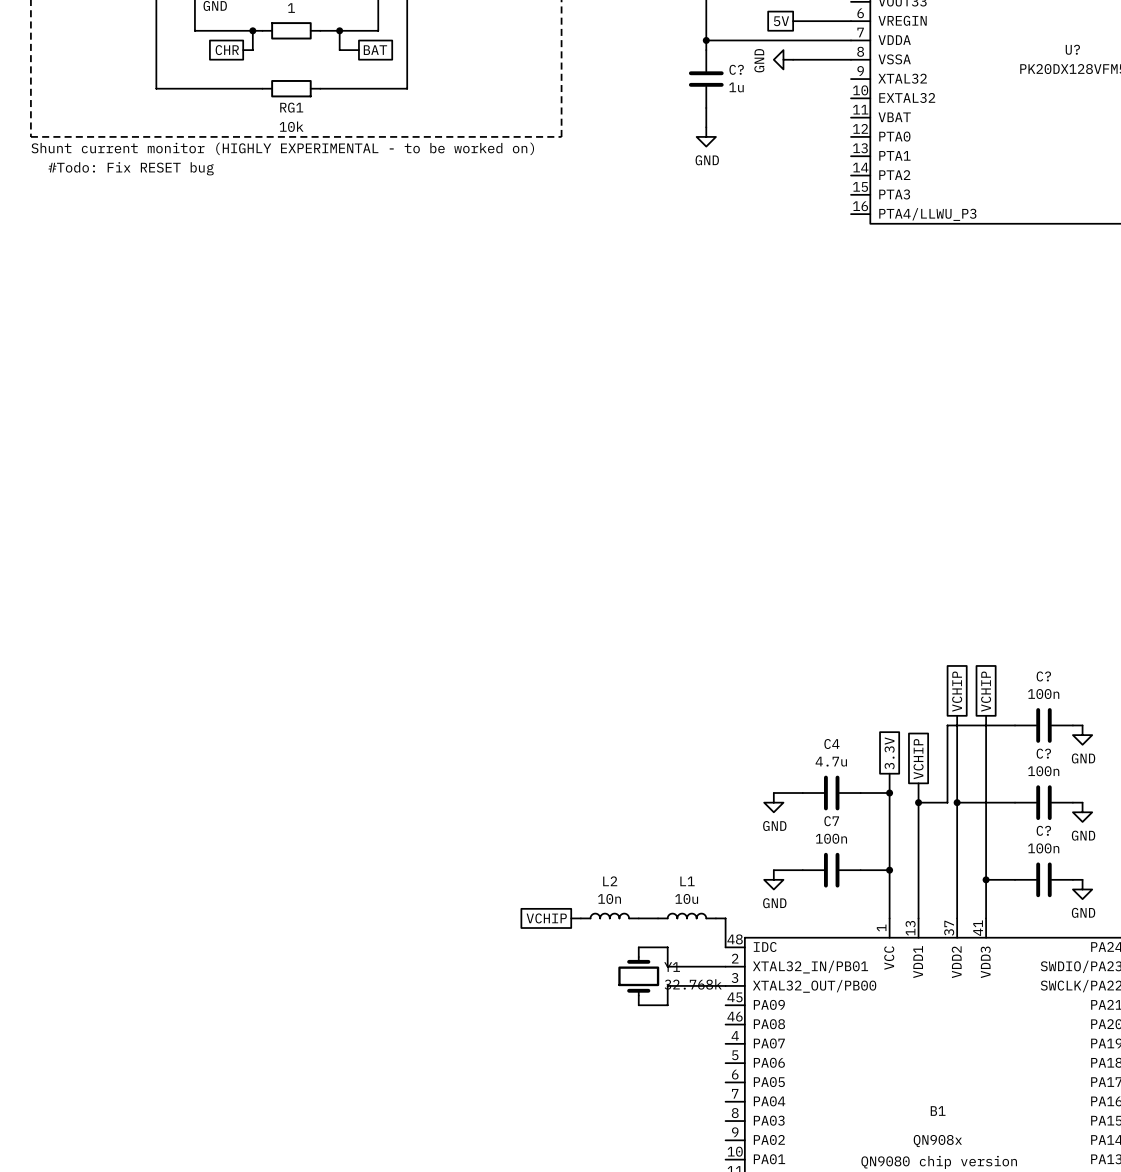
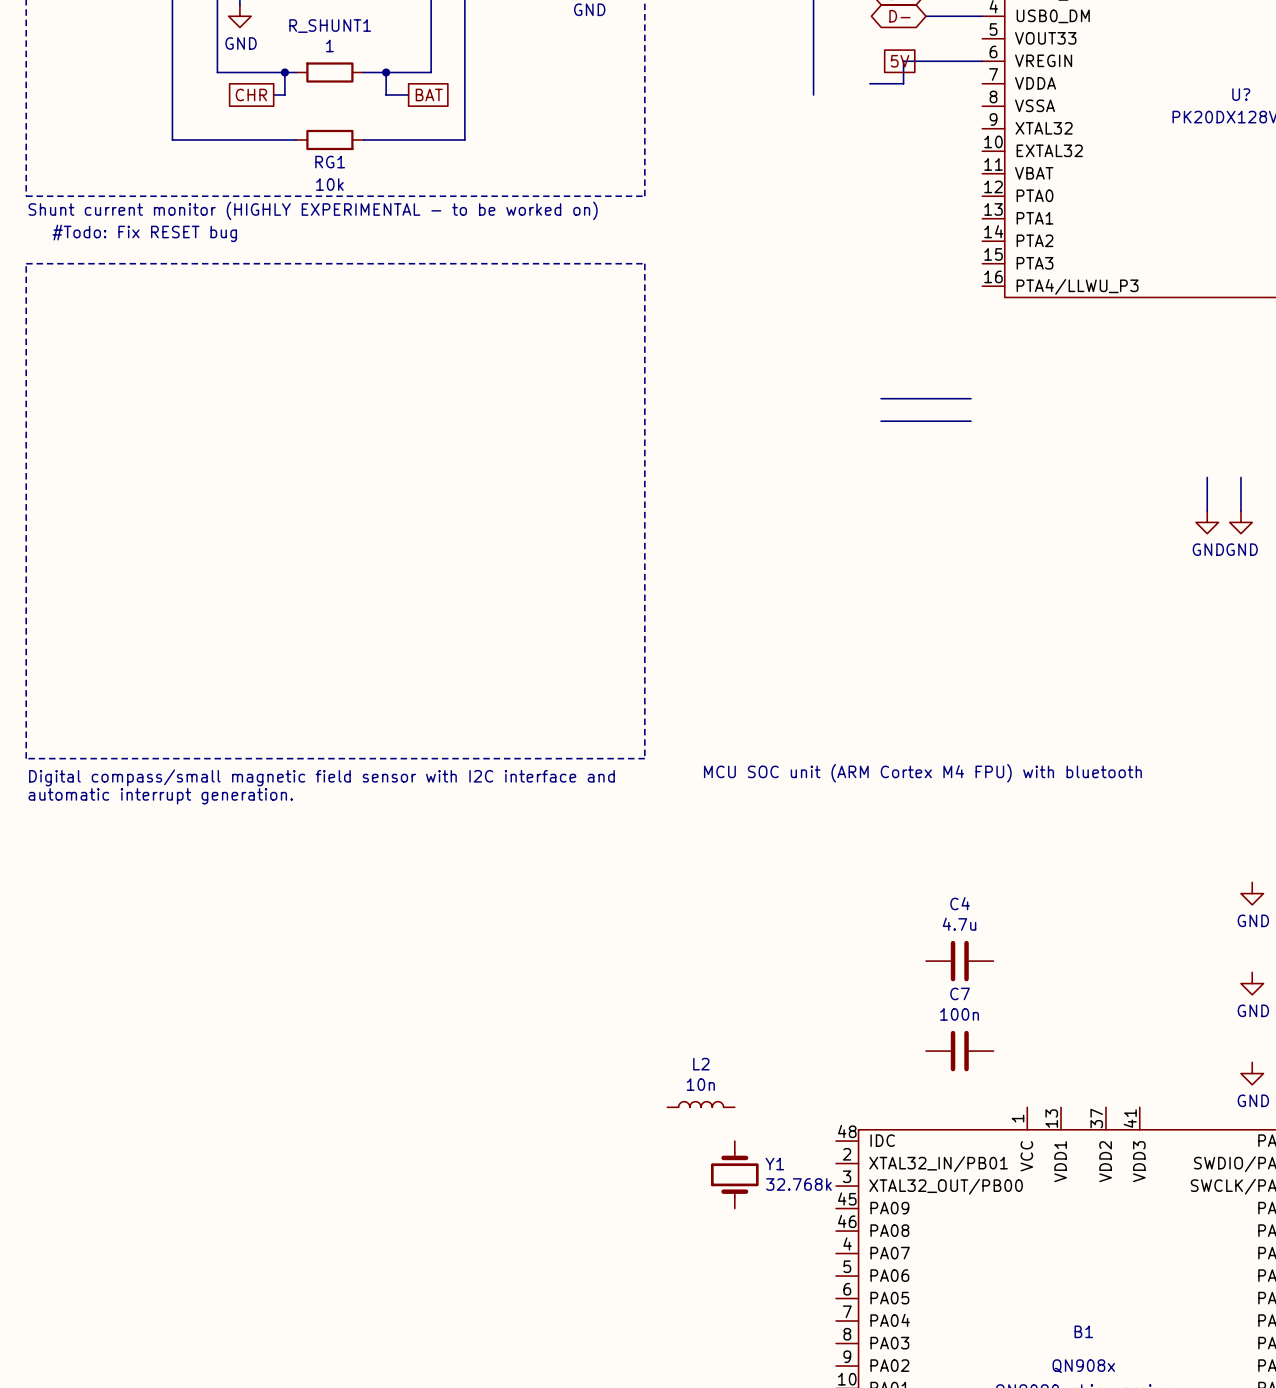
wire: (706, 40) (754, 40) -> none
junction: (706, 40) -> none
wire: (783, 40) (851, 40) -> (903, 83) (903, 61) (914, 61)
power symbol: GND (783, 59) -> none
wire: (793, 59) (851, 59) -> none
C?: 1u (706, 79) -> none
wire: (706, 107) (706, 127) -> none
power symbol: GND (706, 136) -> none
line: none -> (26, 263) (26, 758) (644, 758) (644, 263) (26, 263)
wire: none -> (881, 398) (971, 398)
wire: none -> (881, 421) (971, 421)
wire: none -> (1207, 477) (1207, 511)
wire: none -> (1240, 477) (1240, 511)
power symbol: none -> GND (1207, 522)
power symbol: none -> GND (1240, 522)
text: none -> MCU SOC unit (ARM Cortex M4 FPU) with bluetooth (922, 773)
text: none -> Digital compass/small magnetic field sensor with I2C interface and (321, 777)
text: none -> automatic interrupt generation. (160, 796)
global label: VCHIP (957, 691) -> none
global label: VCHIP (986, 691) -> none
wire: (957, 715) (957, 918) -> none
wire: (986, 715) (986, 918) -> none
wire: (1015, 725) (947, 725) (947, 802) (918, 802) -> none
C?: 100n (1043, 725) -> none
wire: (1072, 725) (1082, 725) -> none
global label: 3.3V (889, 753) -> none
global label: VCHIP (918, 759) -> none
wire: (889, 773) (889, 918) -> none
wire: (918, 783) (918, 918) -> none
wire: (773, 793) (802, 793) -> none
wire: (860, 793) (889, 793) -> none
junction: (889, 793) -> none
power symbol: GND (773, 802) -> none
junction: (918, 802) -> none
wire: (957, 802) (1015, 802) -> none
junction: (957, 802) -> none
C?: 100n (1043, 802) -> none
wire: (1072, 802) (1082, 802) -> none
wire: (773, 870) (802, 870) -> none
wire: (860, 870) (889, 870) -> none
junction: (889, 870) -> none
power symbol: GND (773, 879) -> none
wire: (986, 879) (1015, 879) -> none
junction: (986, 879) -> none
C?: 100n (1043, 879) -> none
wire: (1072, 879) (1082, 879) -> none
L1: 10u (686, 916) -> none
global label: VCHIP (546, 918) -> none
wire: (571, 918) (580, 918) -> none
wire: (638, 918) (658, 918) -> none
wire: (715, 918) (725, 918) (725, 947) -> none
wire: (638, 947) (667, 947) (667, 966) (725, 966) -> none
wire: (725, 985) (667, 985) (667, 1005) (638, 1005) -> none

